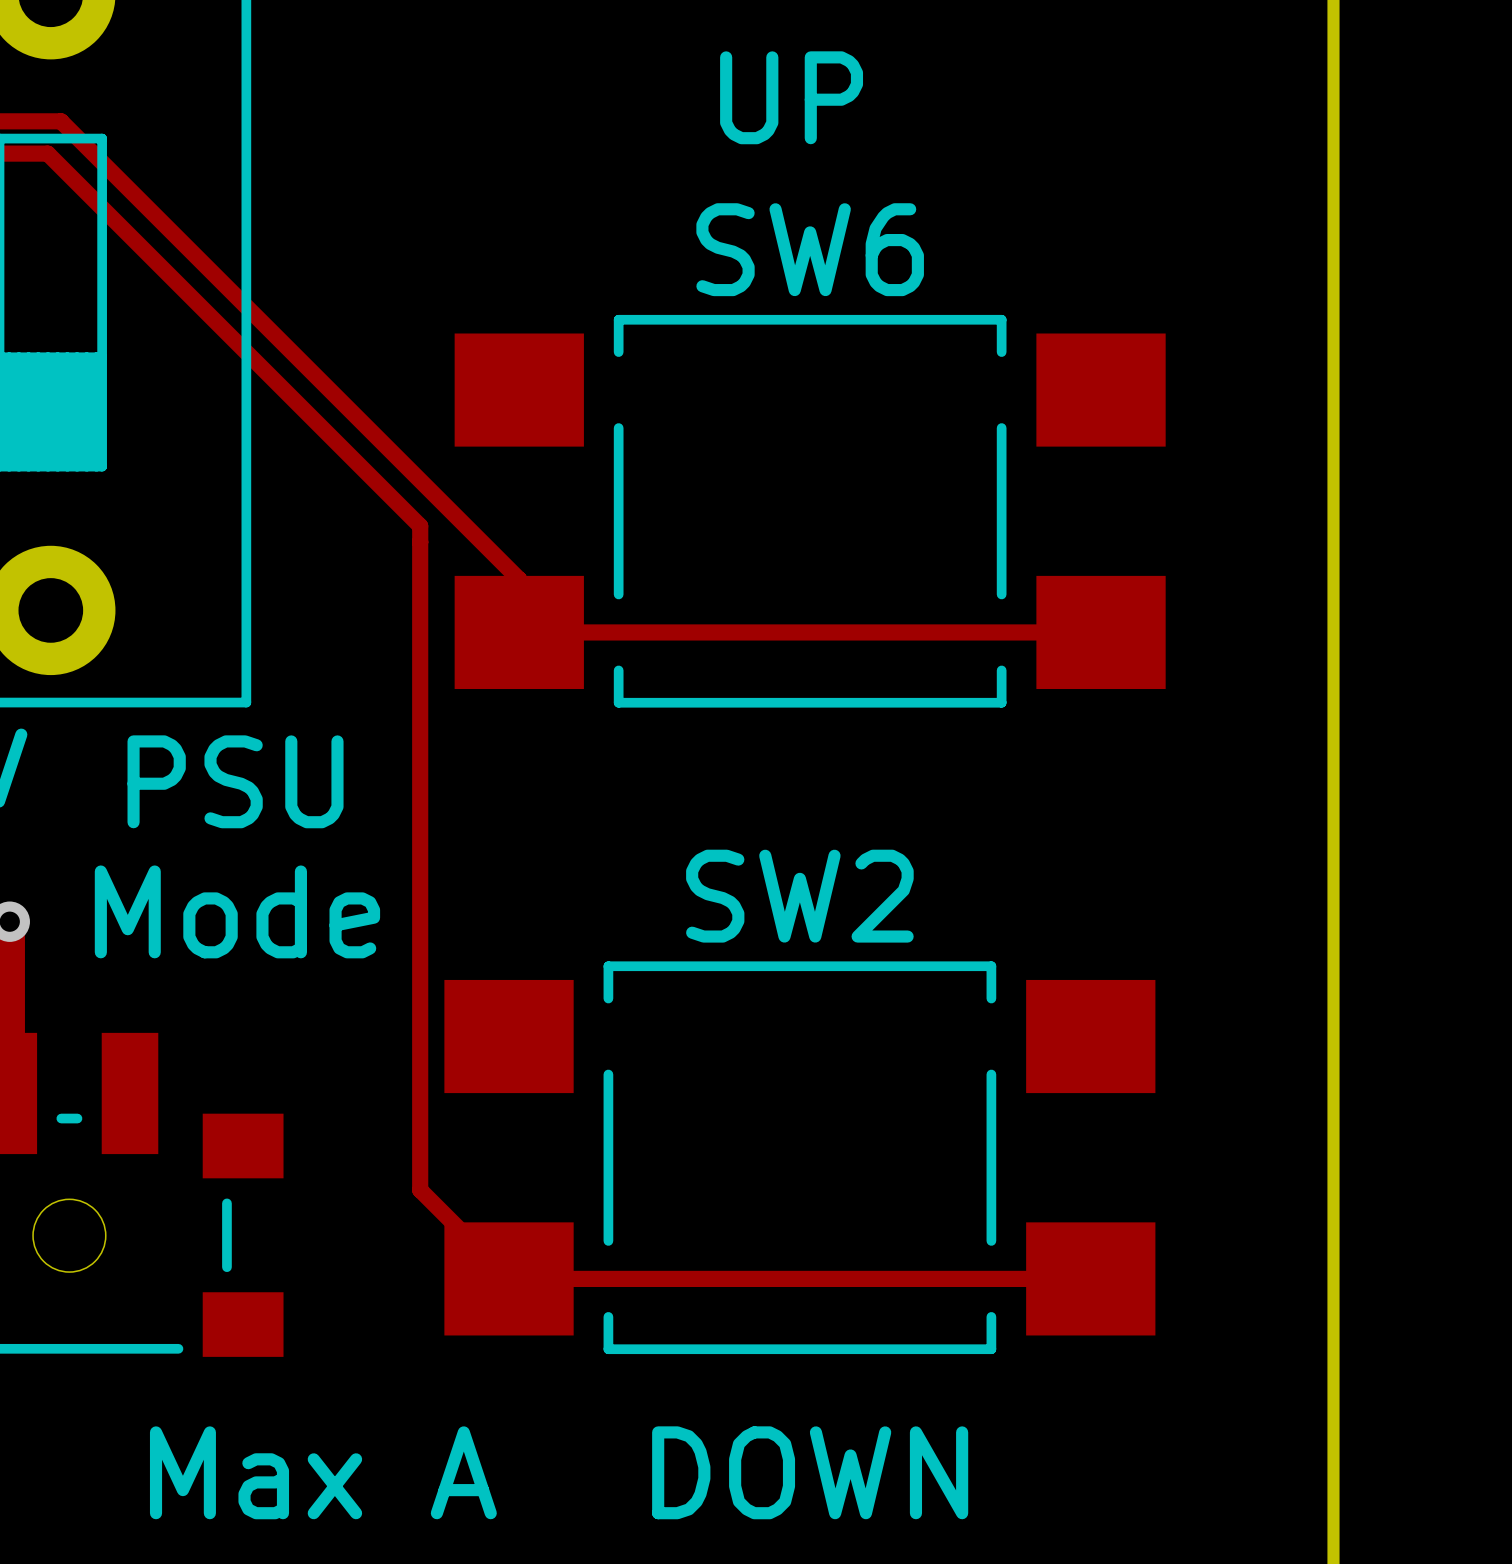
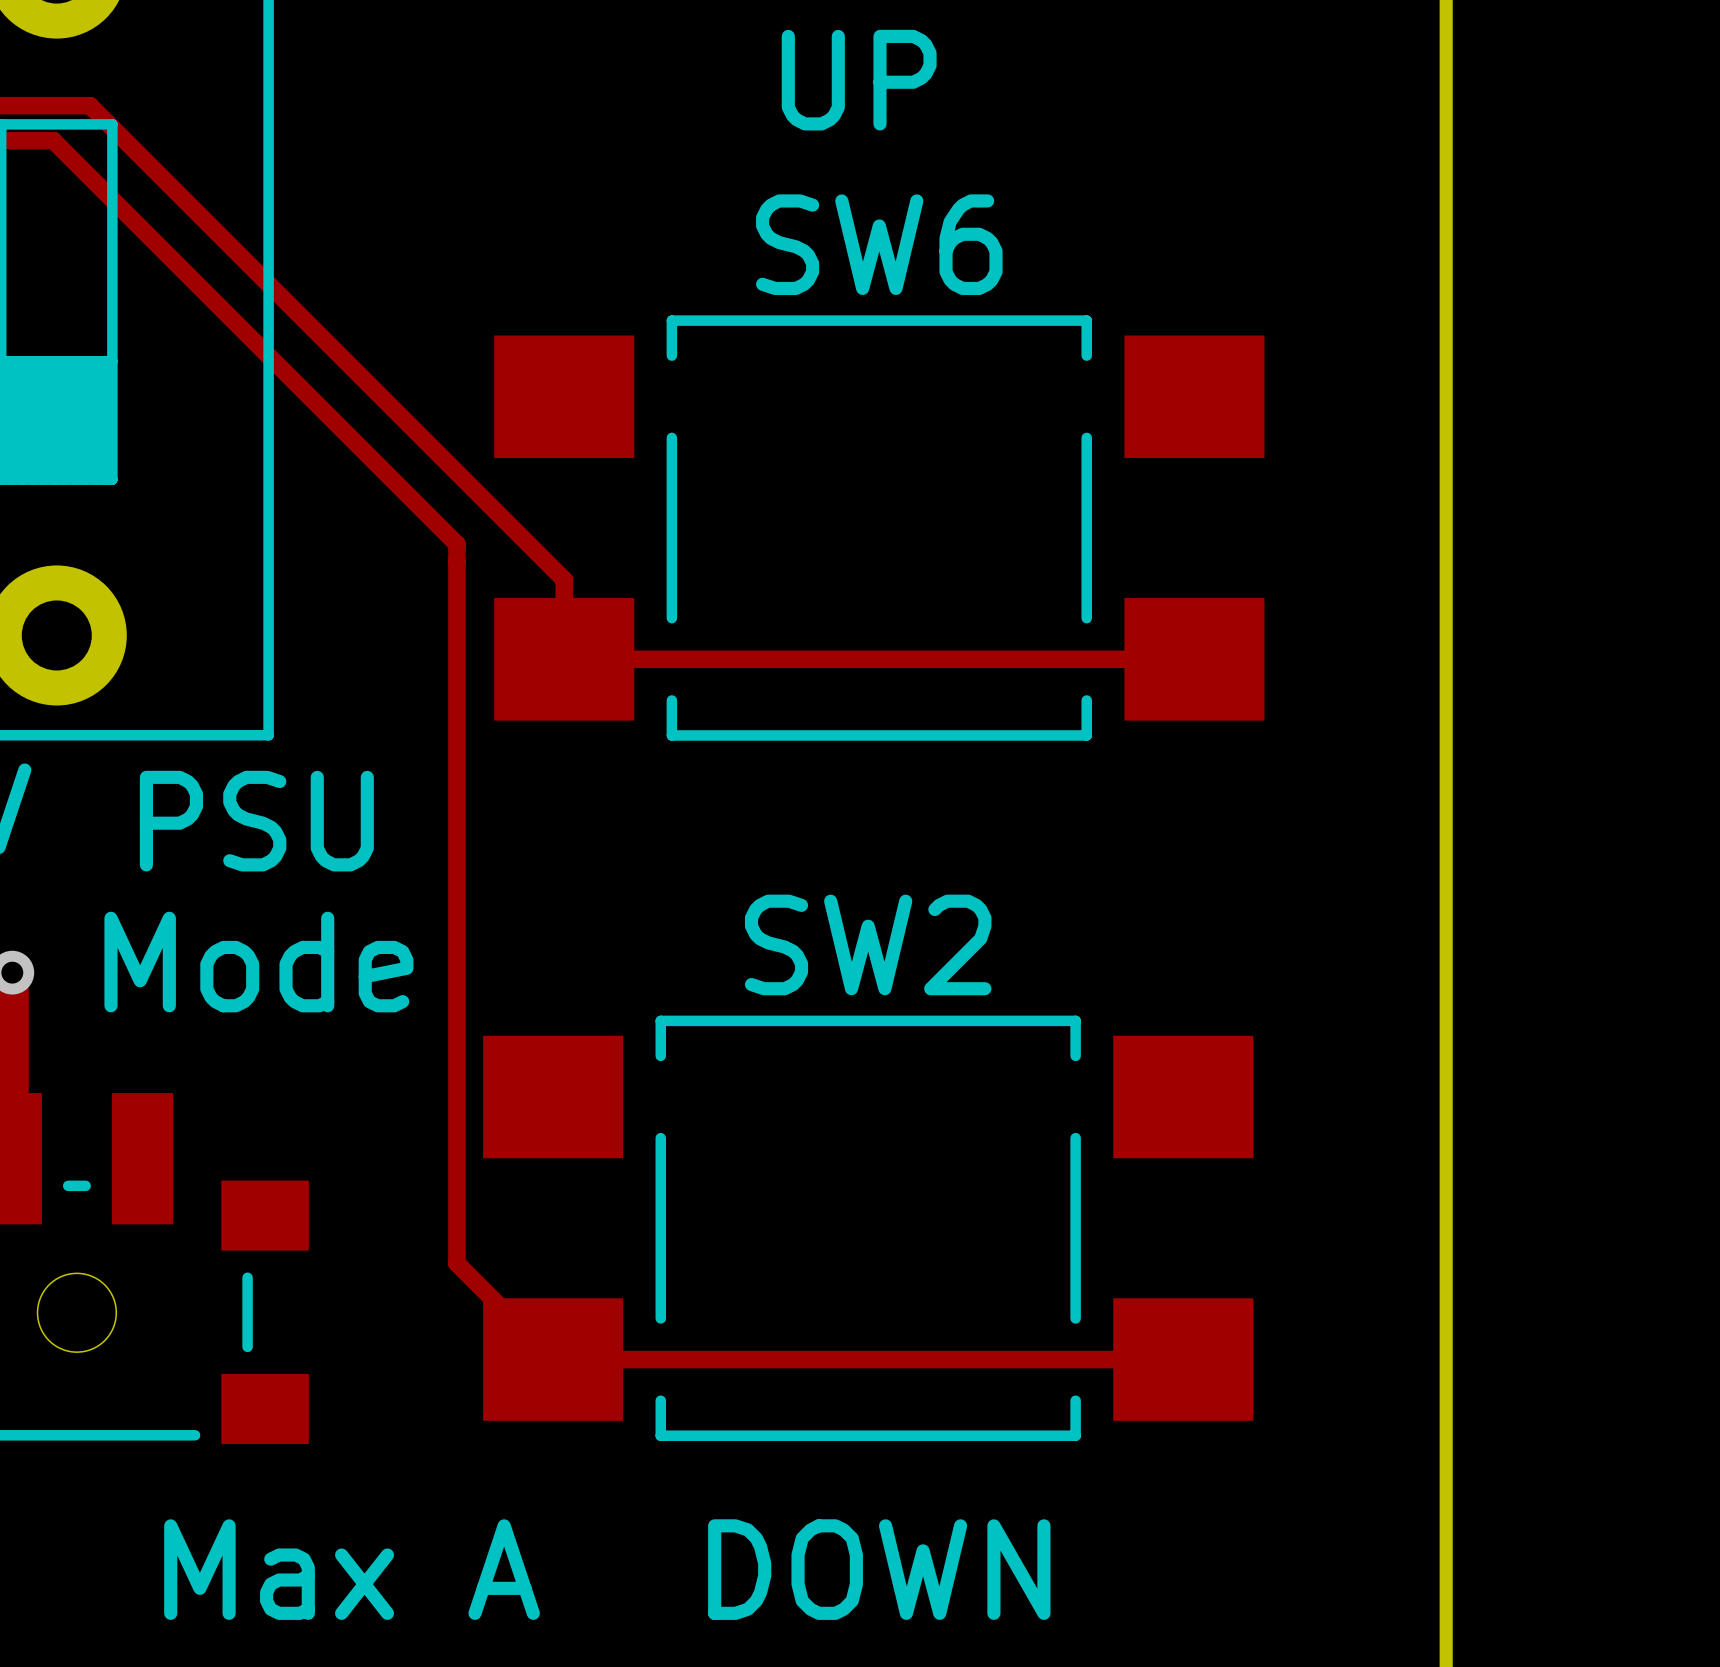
track: (61, 121) (519, 579) -> (67, 105) (90, 105) (564, 579) (564, 601)

